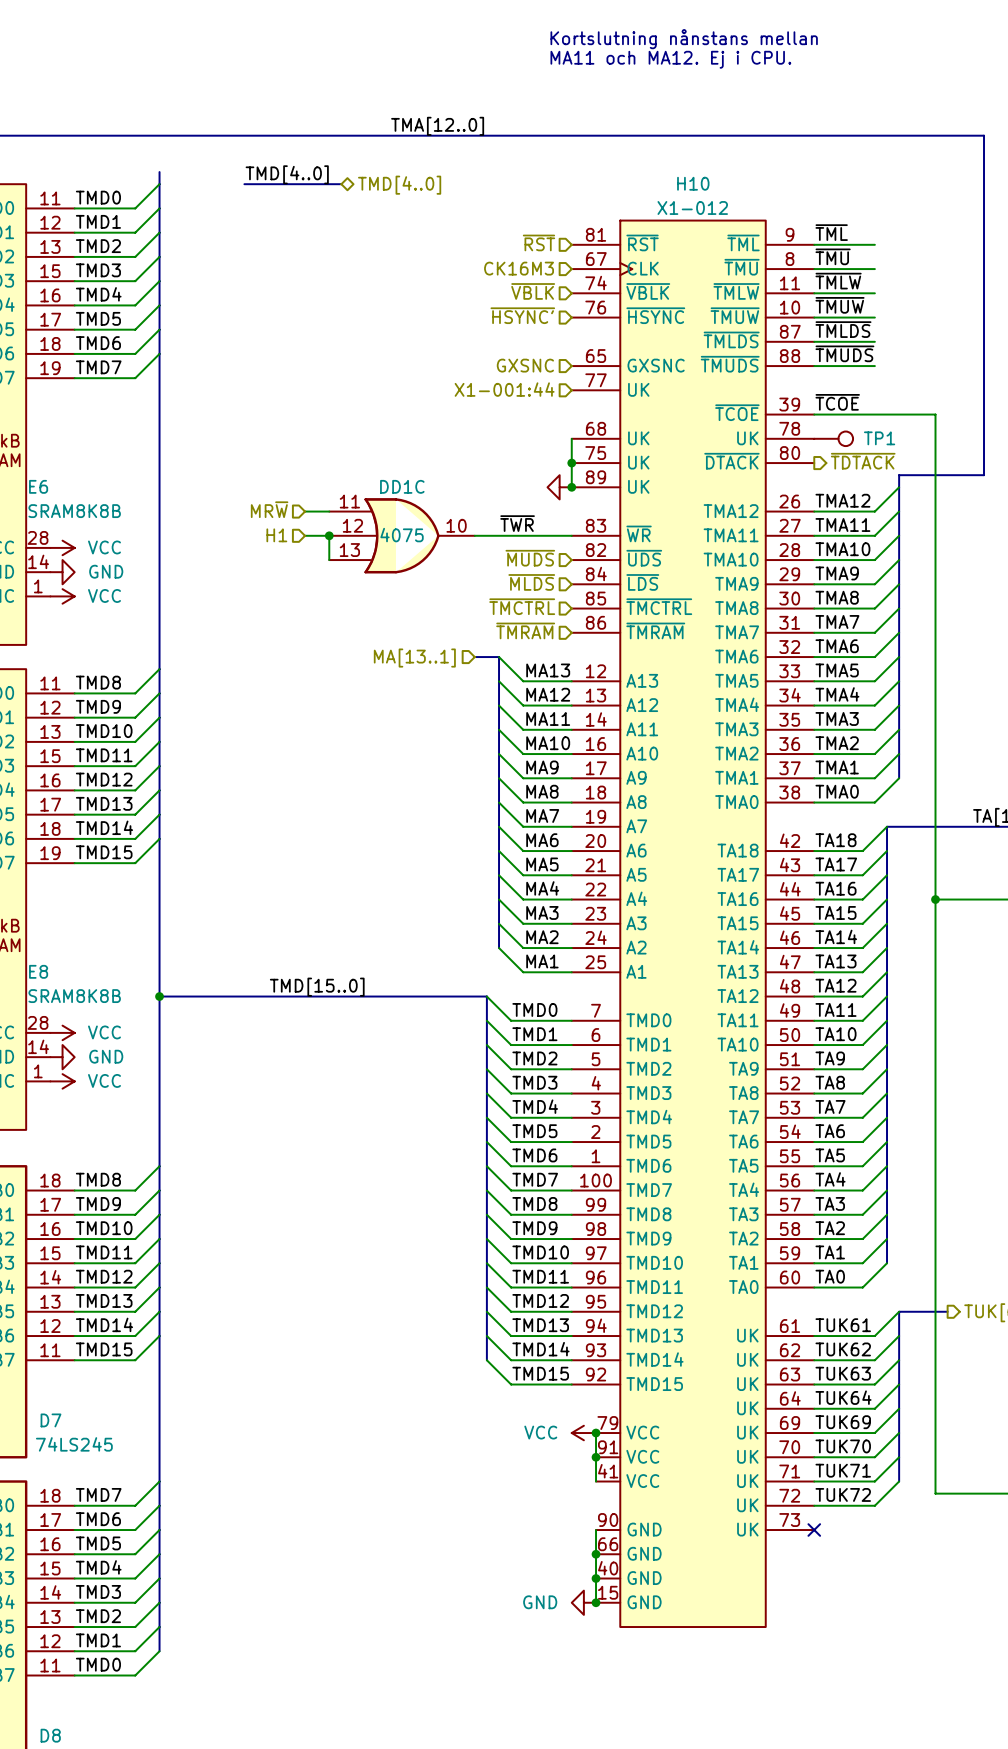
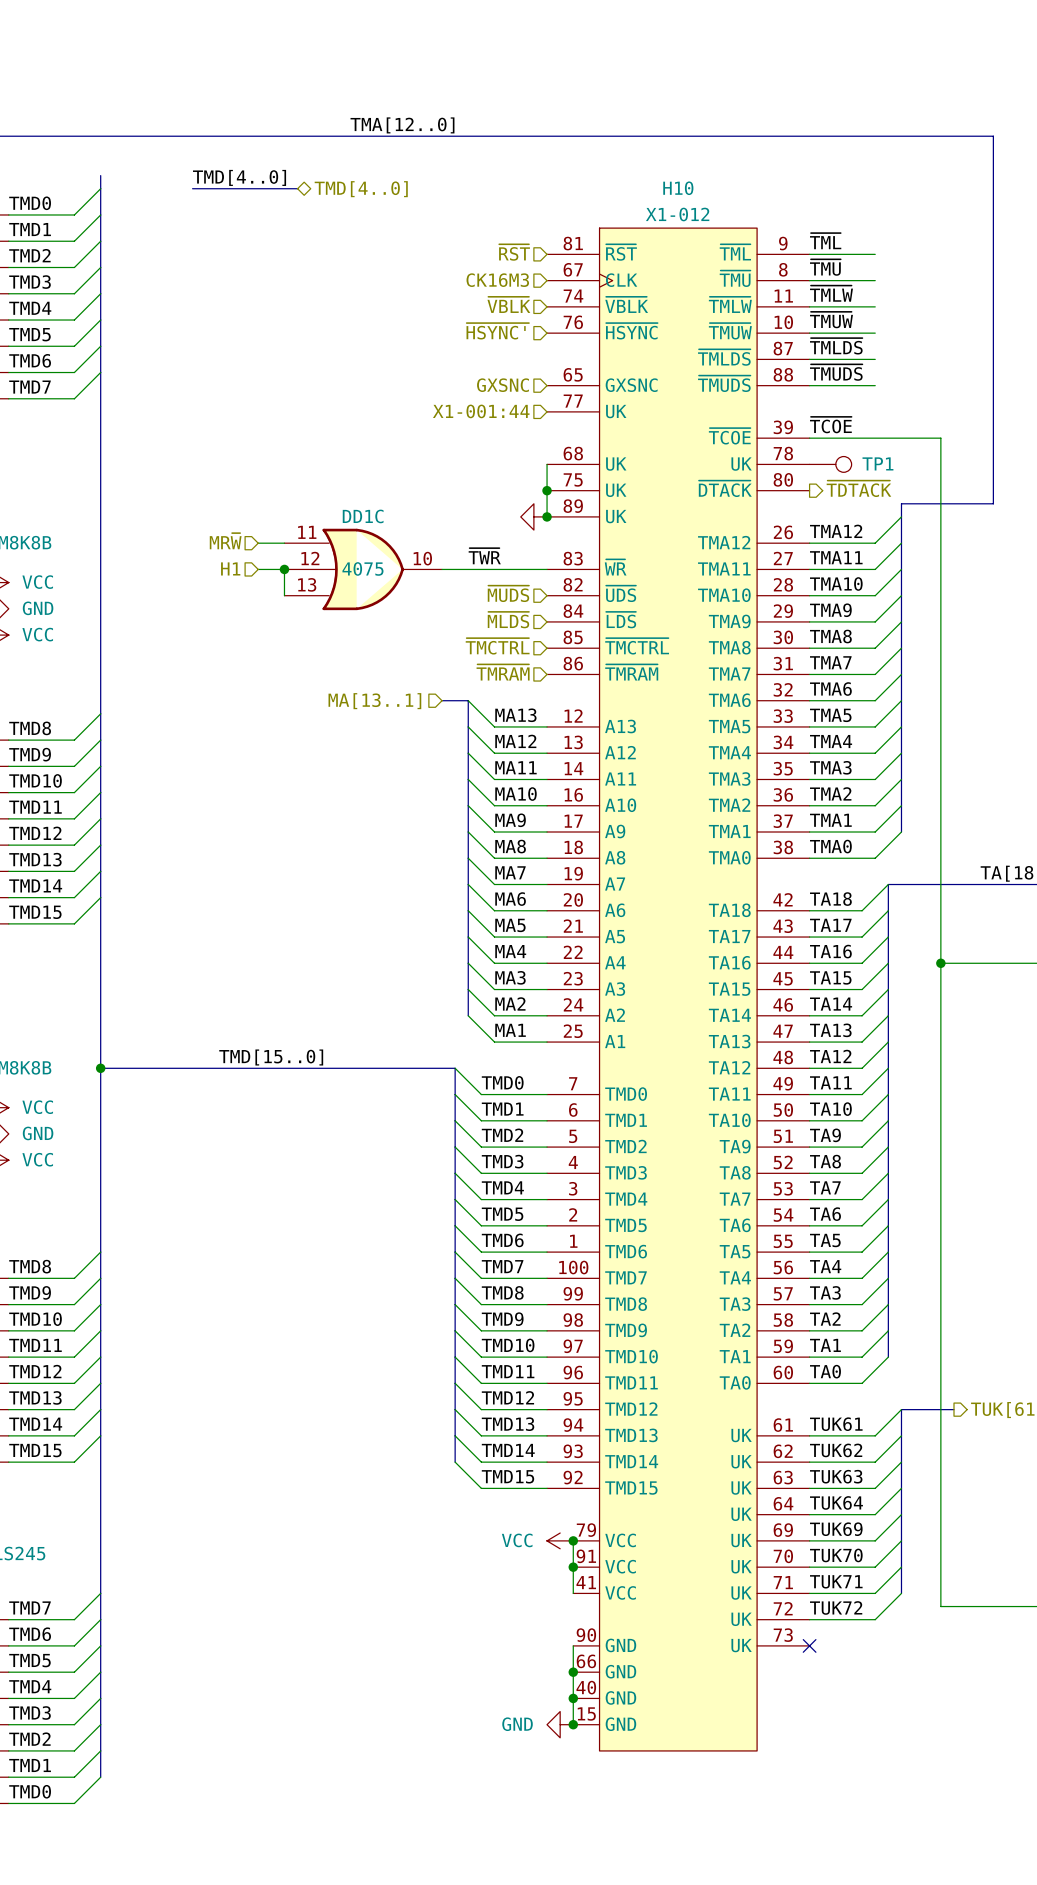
text: Kortslutning nånstans mellan (684, 39) -> none
text: MA11 och MA12. Ej i CPU. (670, 59) -> none

